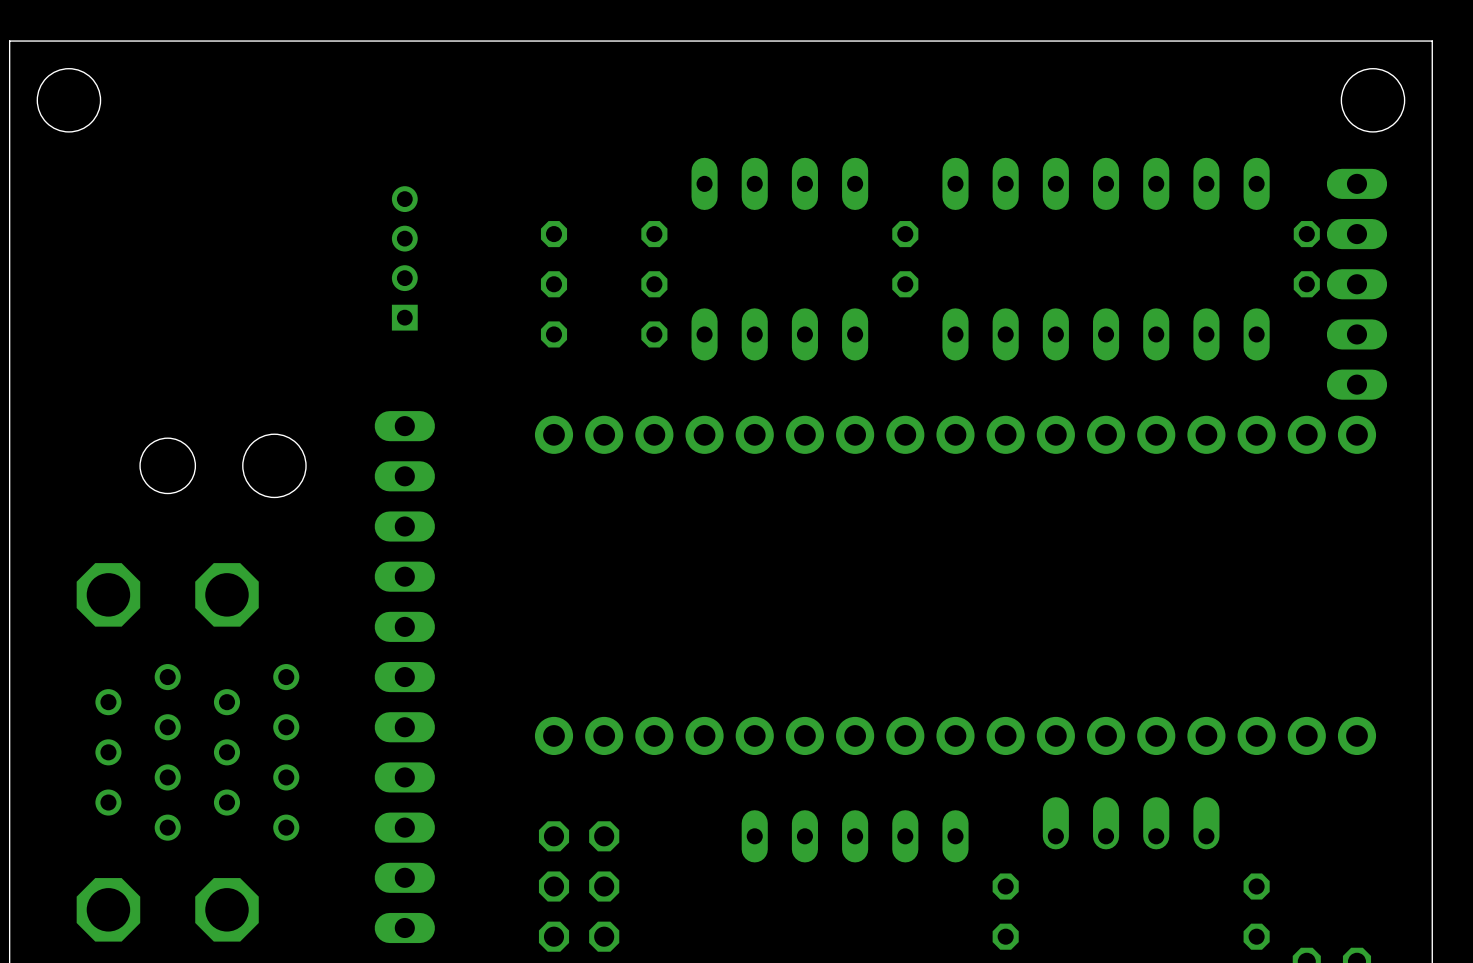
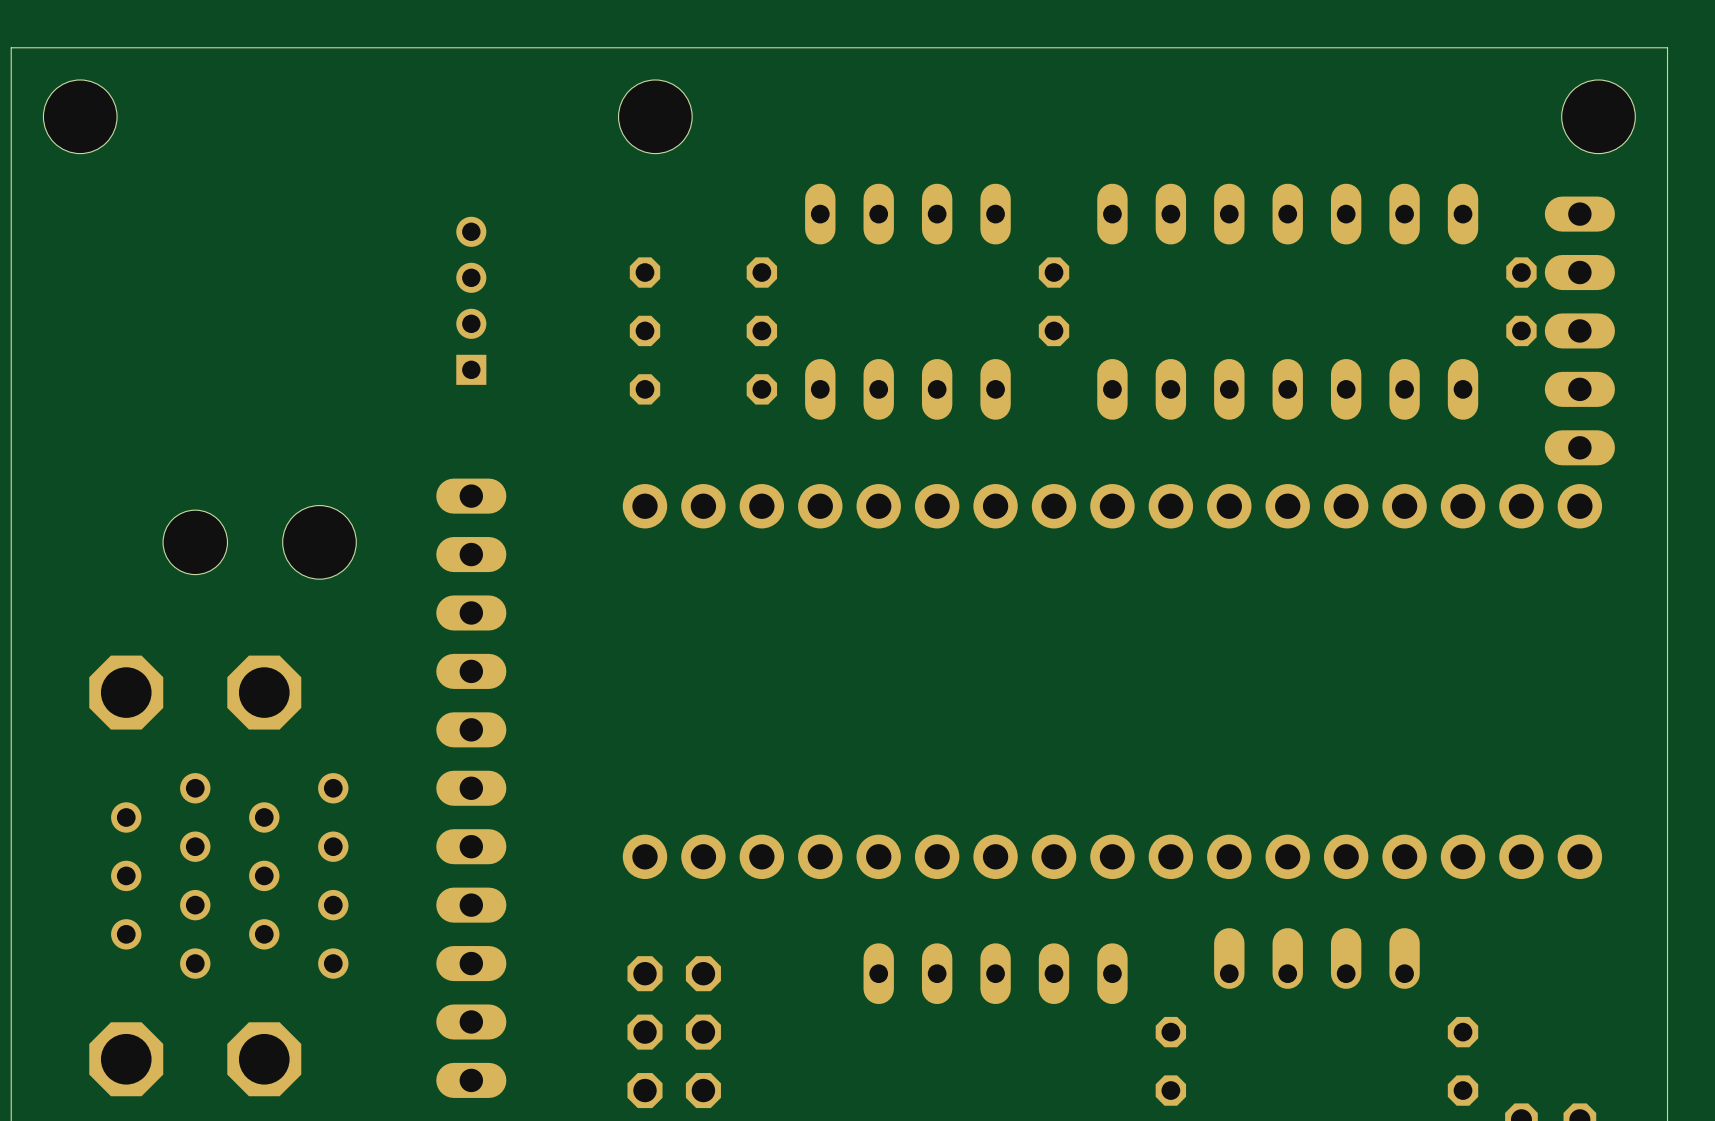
hole: none -> (655, 116)

